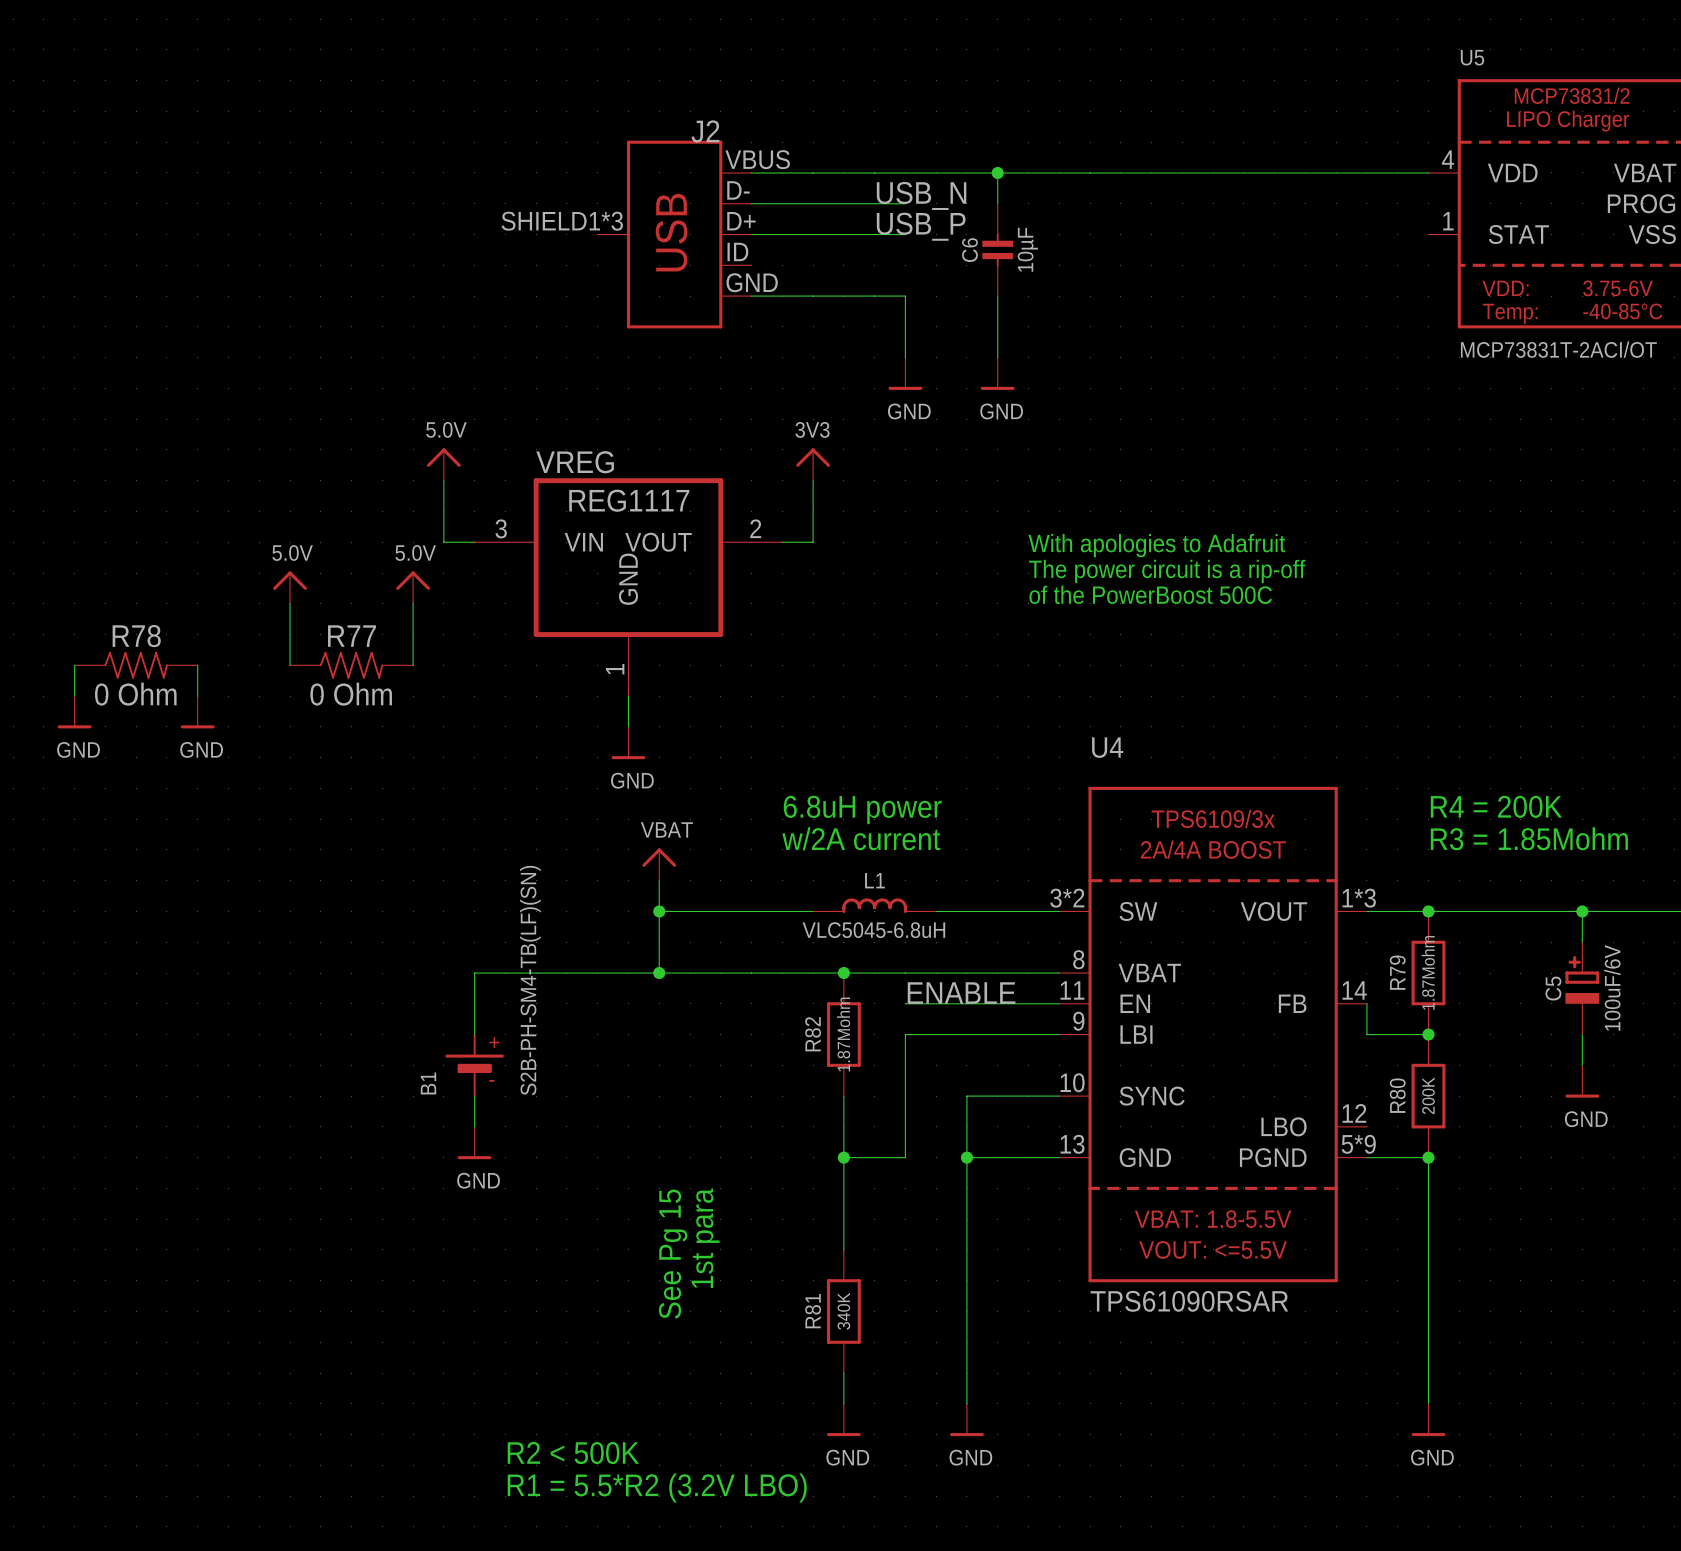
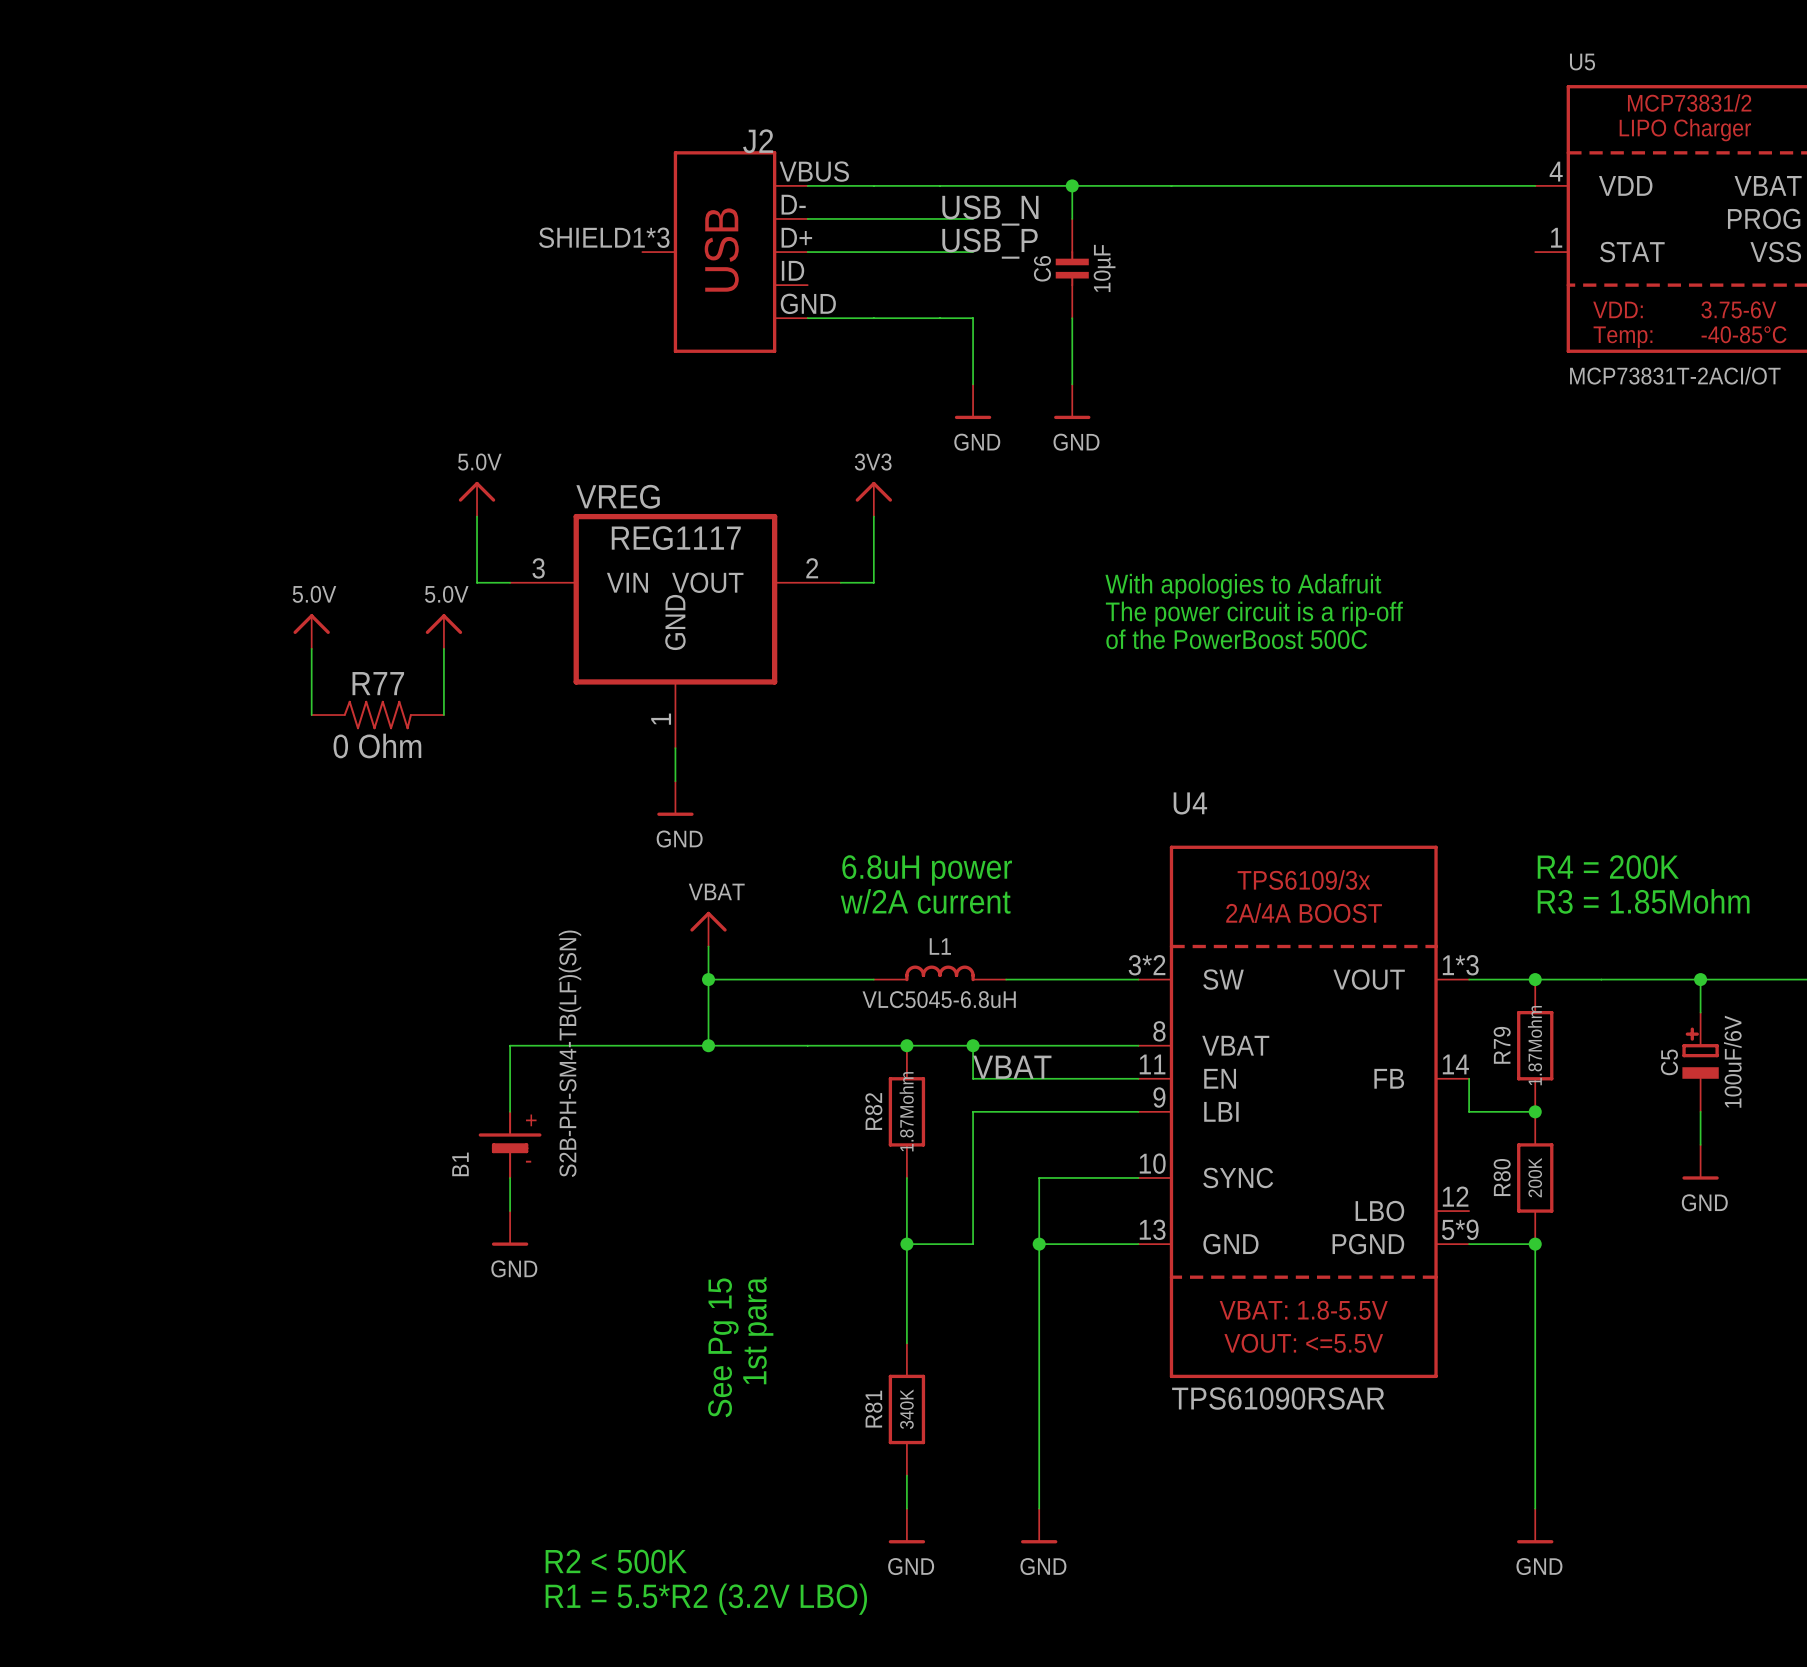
wire: (74, 665) (74, 696) -> none
R78: 0 Ohm (136, 665) -> none
wire: (197, 665) (197, 696) -> none
power symbol: GND (74, 712) -> none
power symbol: GND (197, 712) -> none
wire: none -> (973, 1045) (973, 1078)
junction: none -> (973, 1045)
label: ENABLE (961, 993) -> VBAT (1012, 1067)

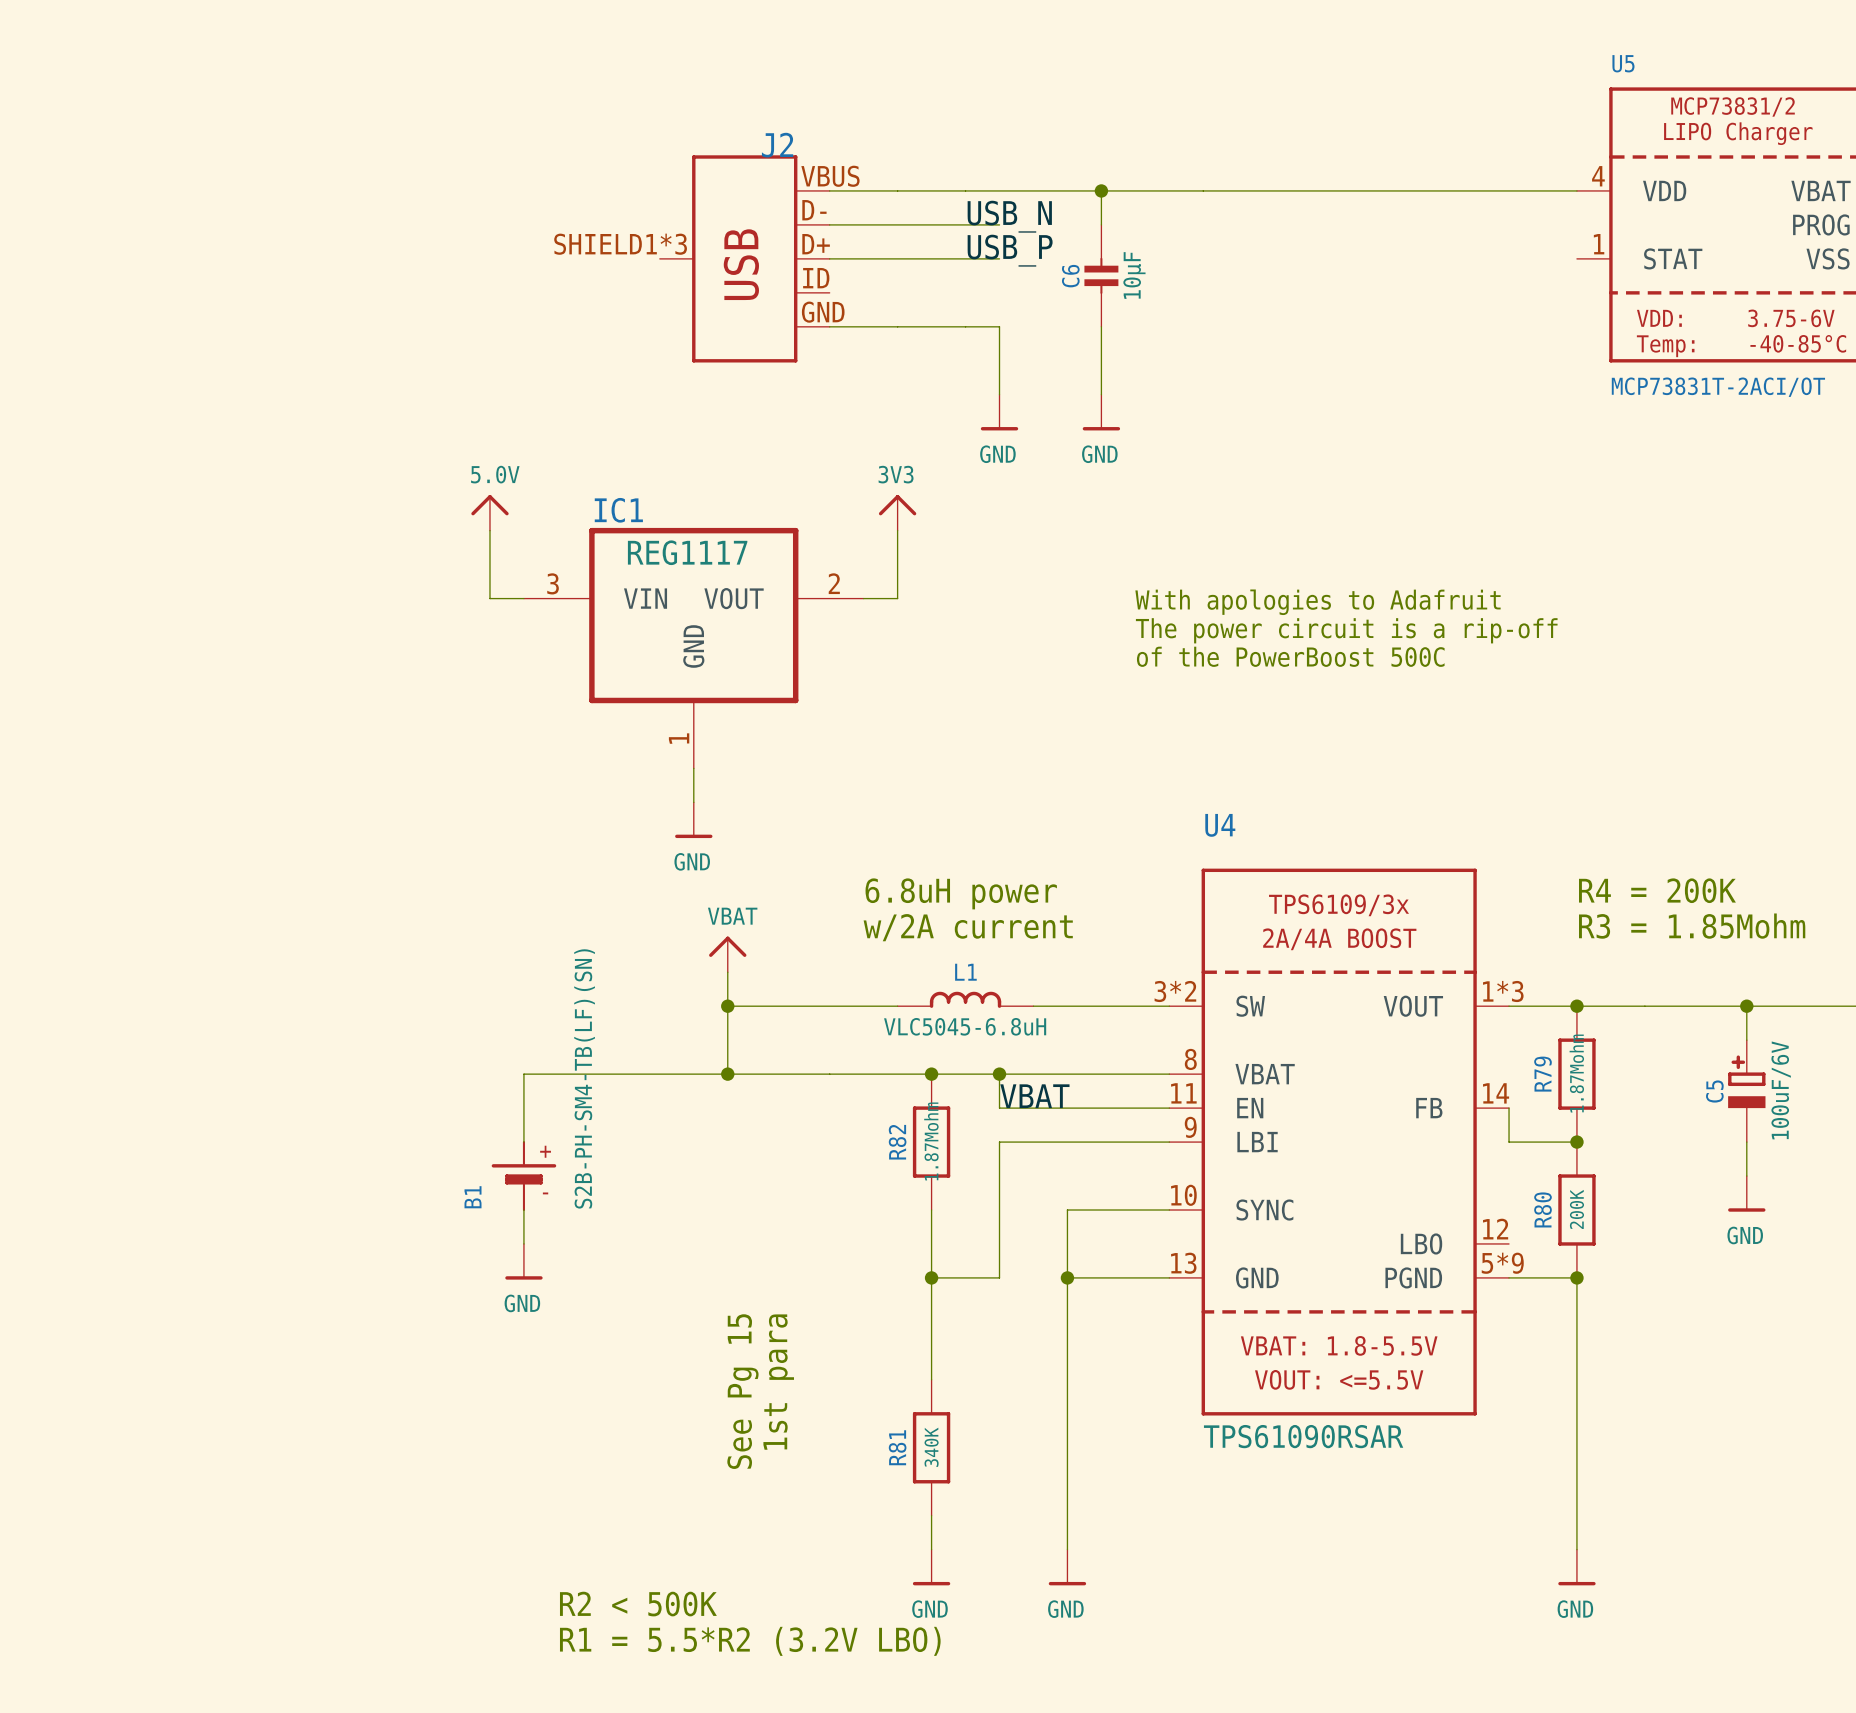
VREG name: VREG (618, 496) -> IC1 (618, 510)
power symbol: 5.0V (311, 631) -> none
power symbol: 5.0V (443, 631) -> none
wire: (311, 648) (311, 715) -> none
wire: (443, 648) (443, 715) -> none
R77: 0 Ohm (377, 715) -> none

